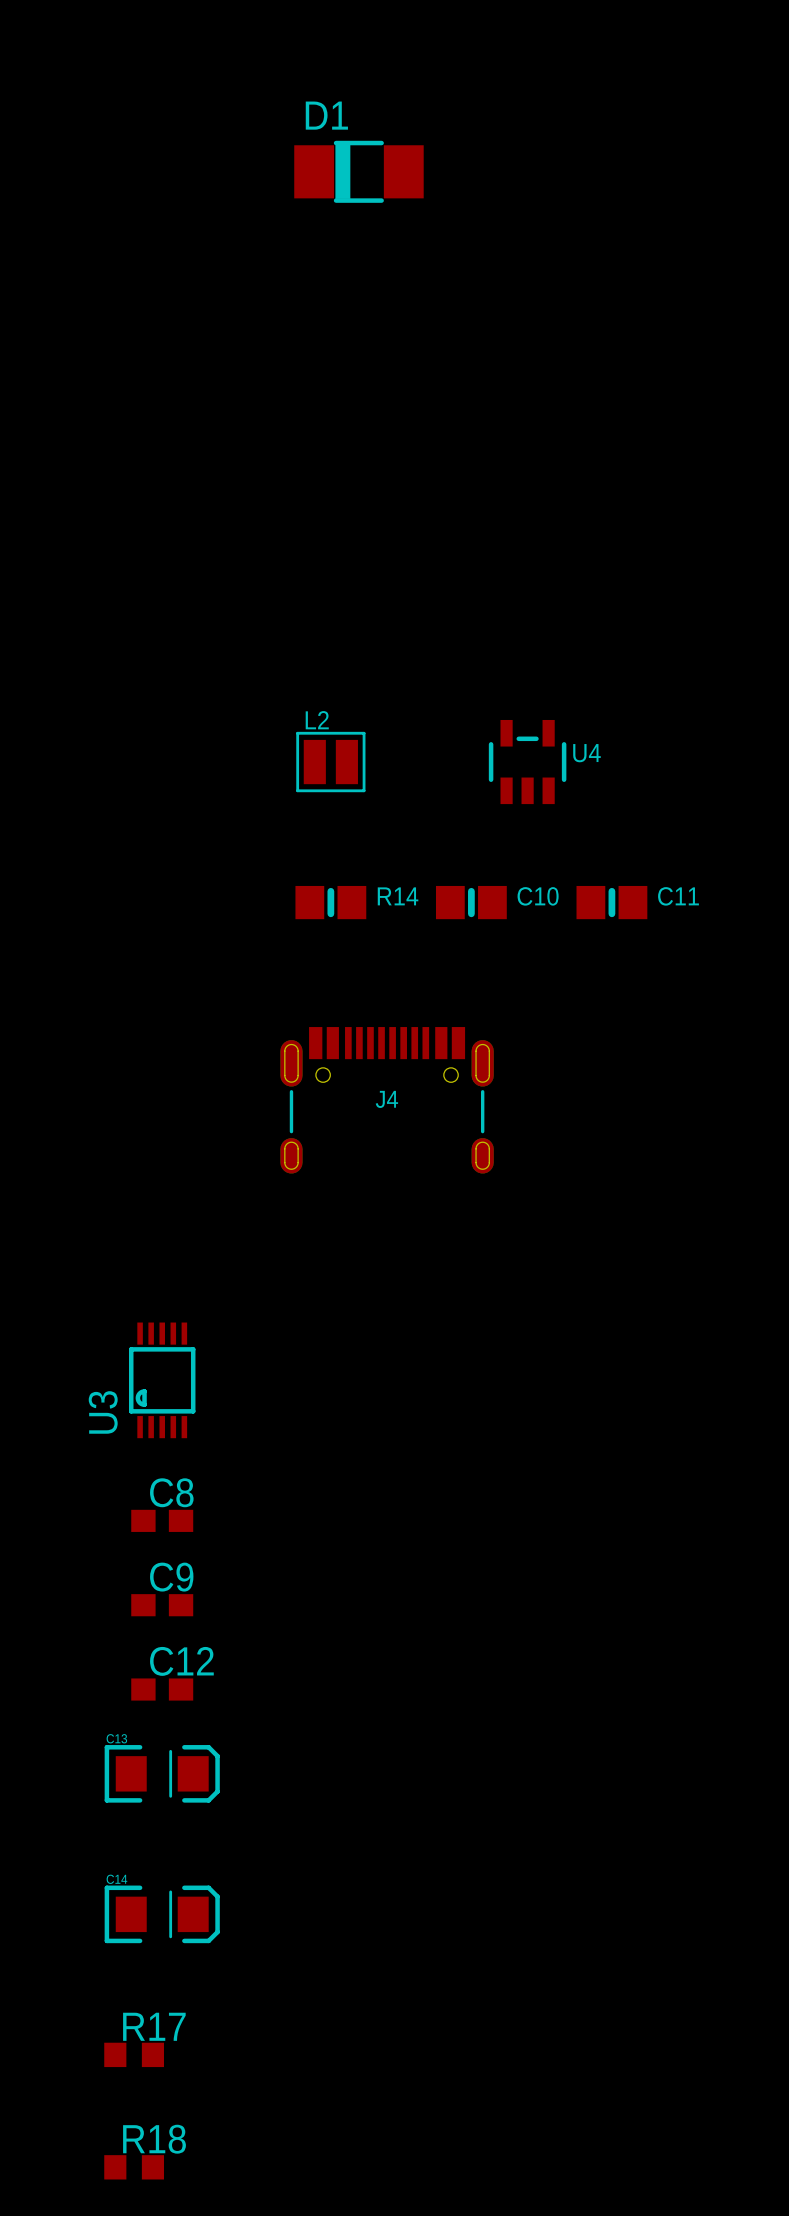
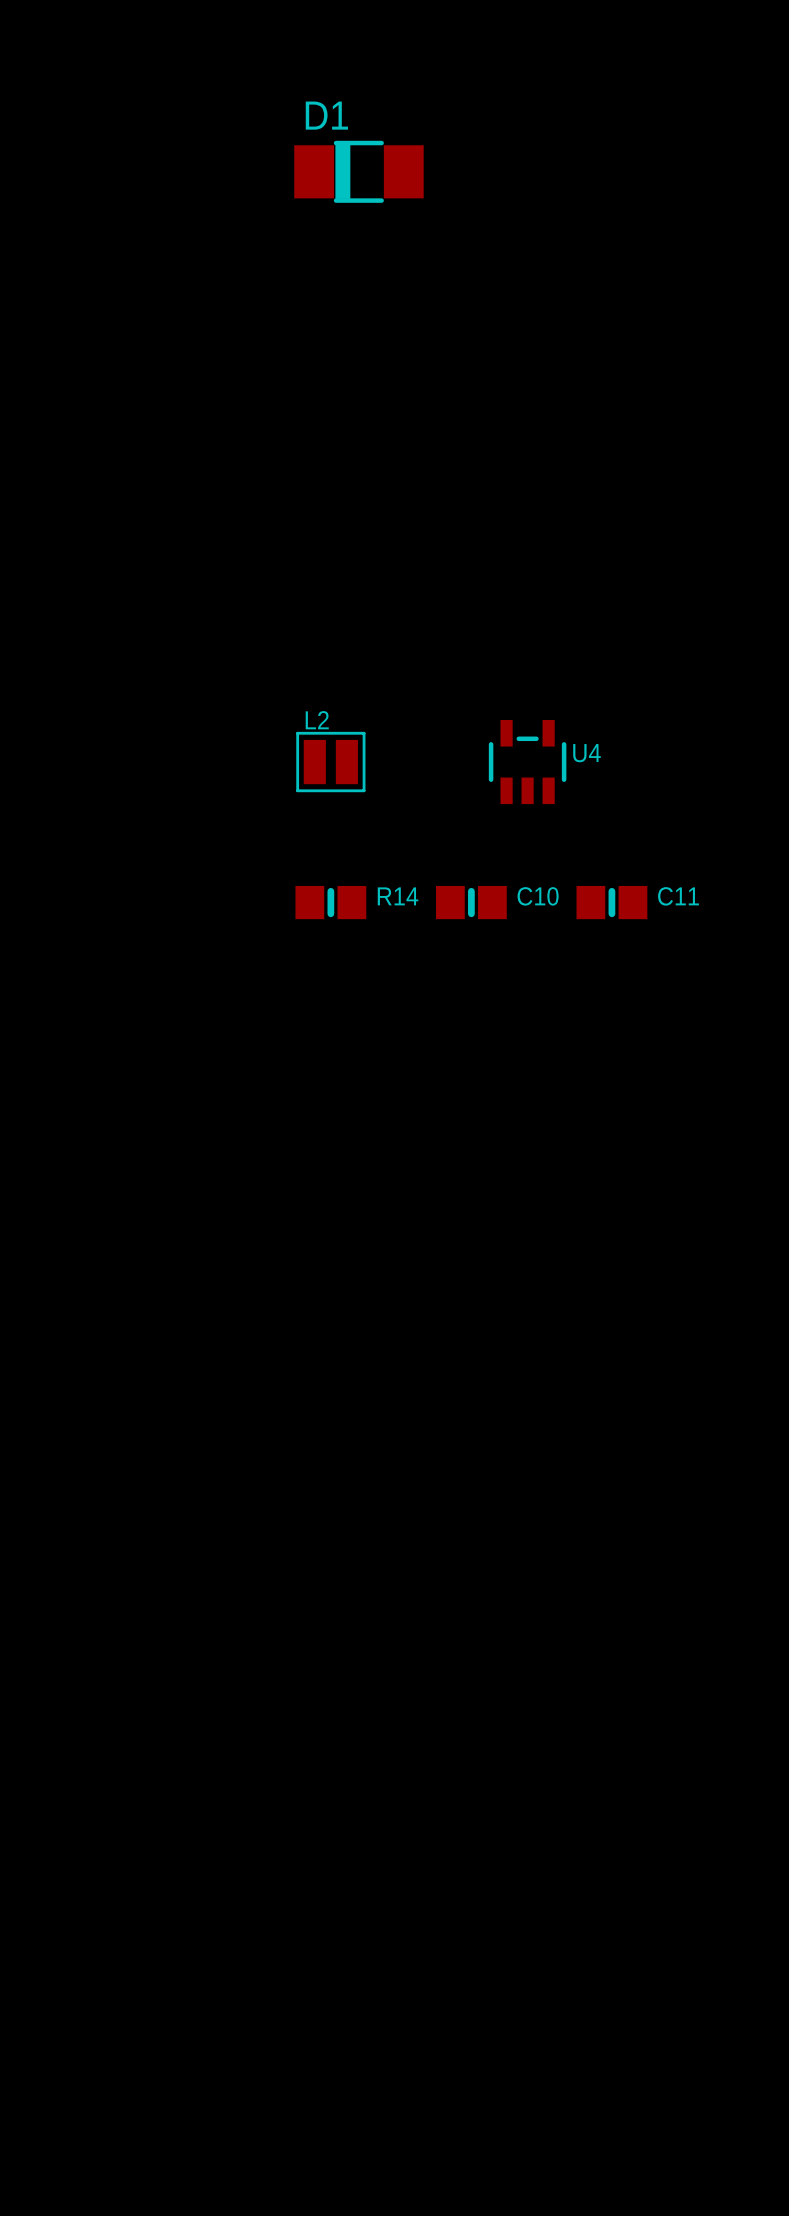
J4: (387, 1100) -> none
U3: (162, 1380) -> none
C8: (162, 1520) -> none
C9: (162, 1605) -> none
C12: (162, 1689) -> none
C13: (162, 1773) -> none
C14: (162, 1914) -> none
R17: (134, 2054) -> none
R18: (134, 2167) -> none

